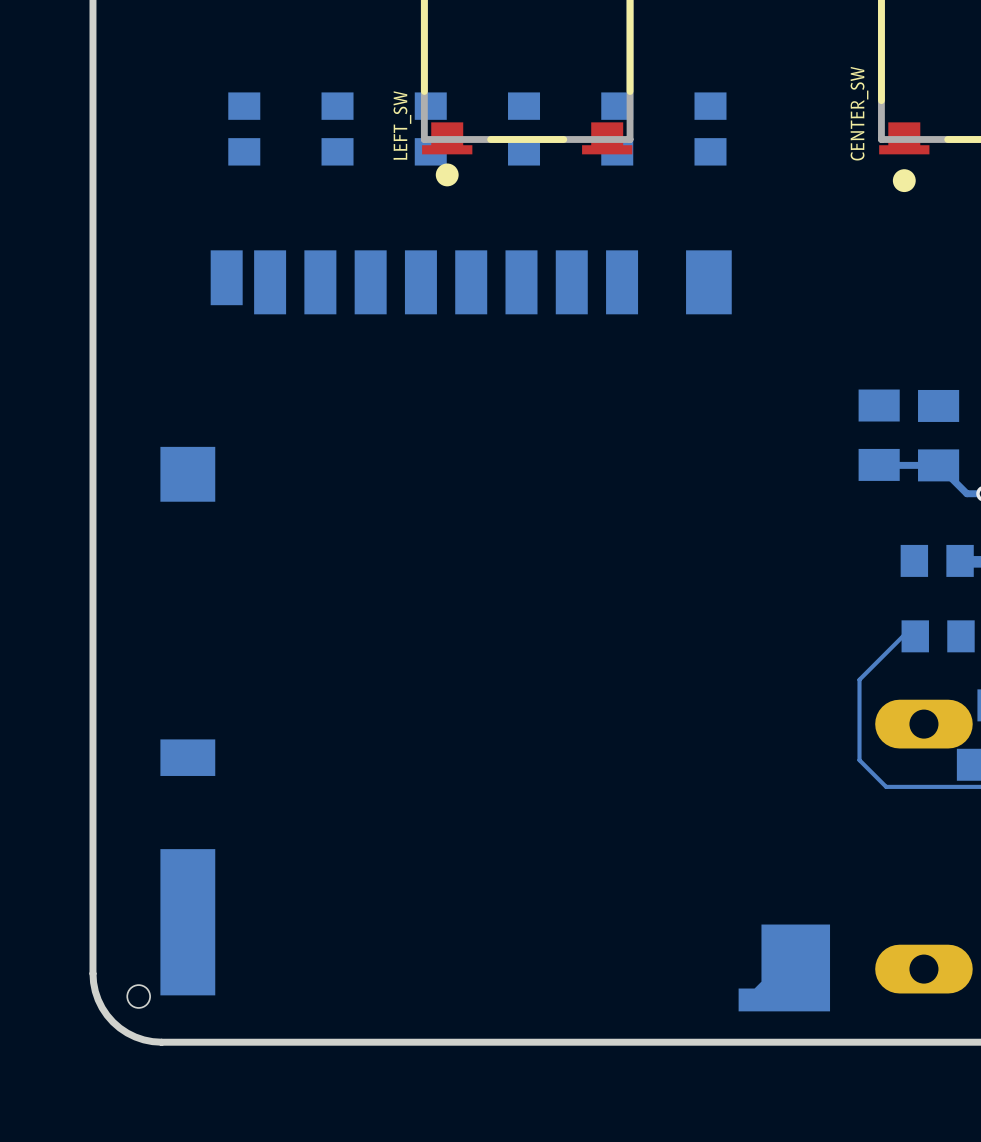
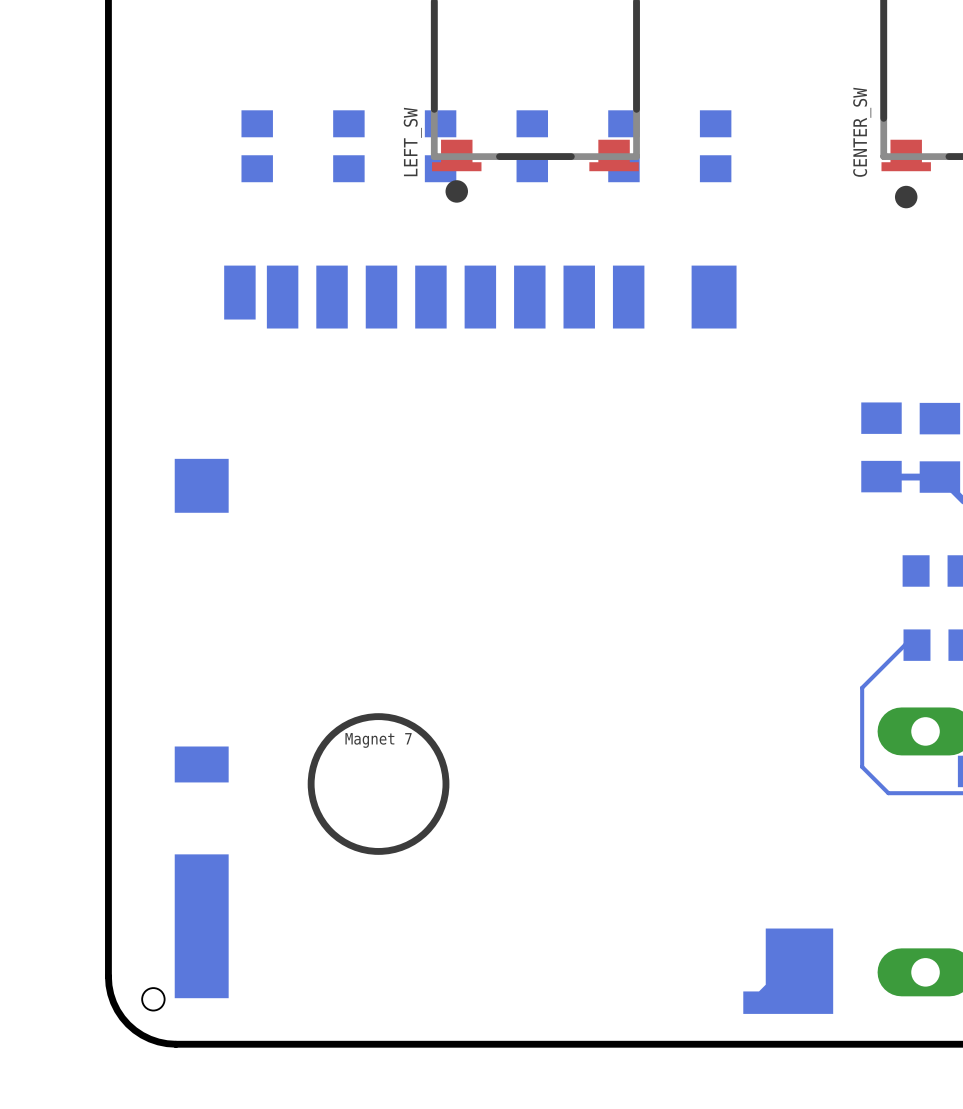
drawing: none -> [307, 713, 450, 855]
text: none -> Magnet 7 (378, 740)

